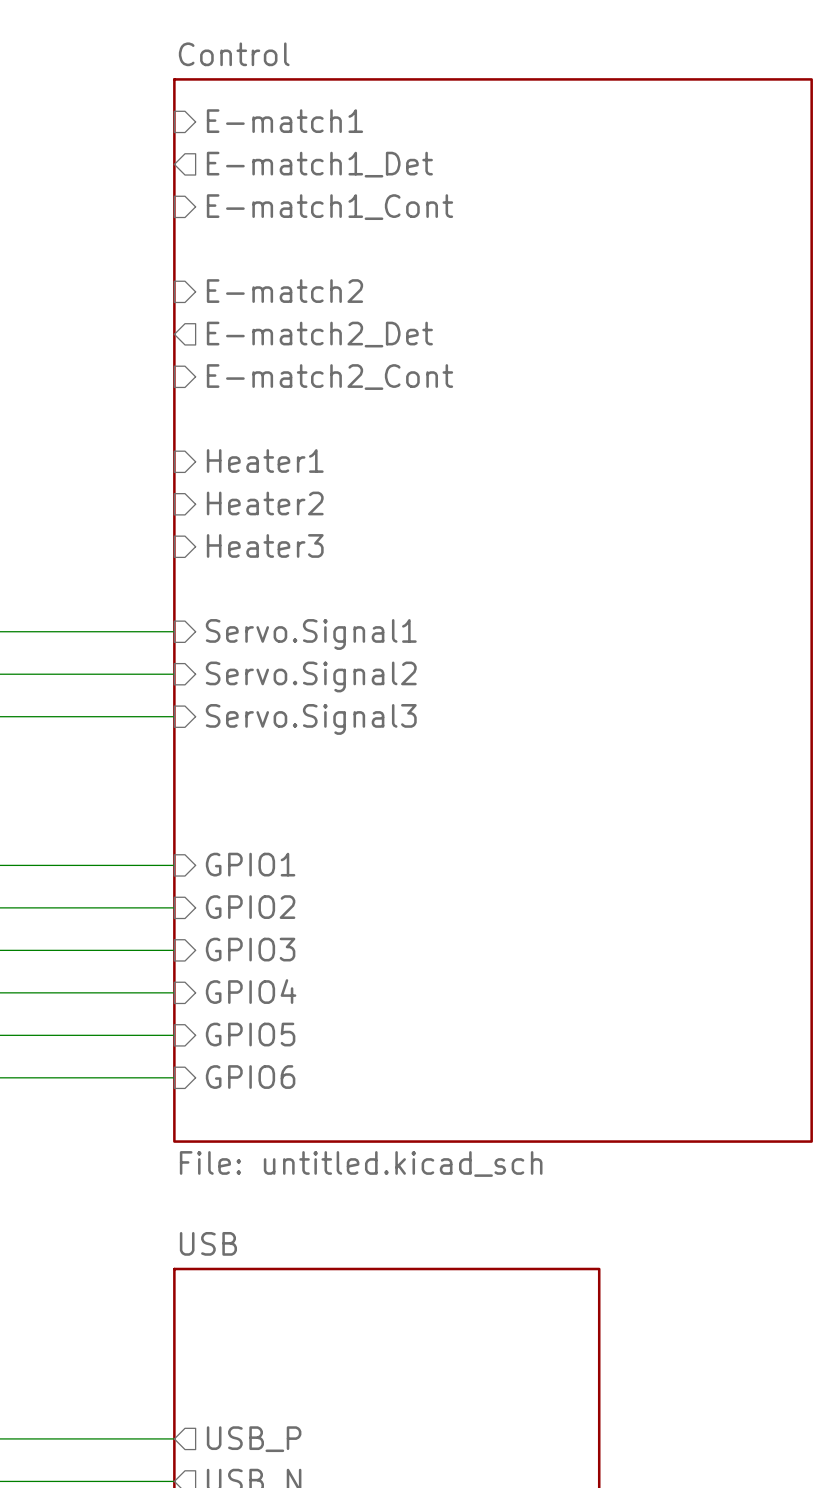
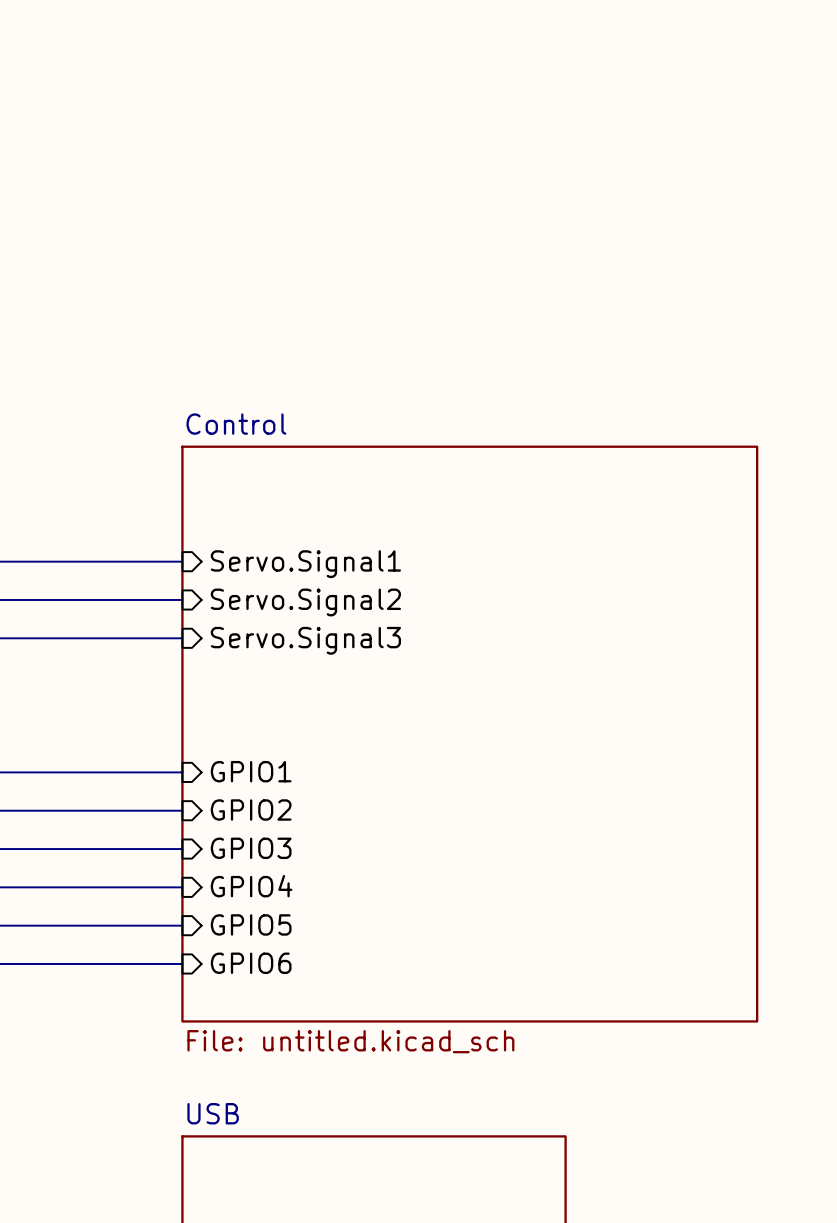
sheet pin: E-match1 (284, 121) -> none
sheet pin: E-match1_Det (319, 164) -> none
sheet pin: E-match1_Cont (329, 207) -> none
sheet pin: E-match2 (284, 291) -> none
sheet pin: E-match2_Det (319, 334) -> none
sheet pin: E-match2_Cont (329, 377) -> none
sheet pin: Heater1 (265, 461) -> none
sheet pin: Heater2 (265, 503) -> none
sheet pin: Heater3 (265, 545) -> none
sheet Control: File: untitled.kicad_sch (493, 610) -> none
sheet Control: none -> File: untitled.kicad_sch (469, 734)

